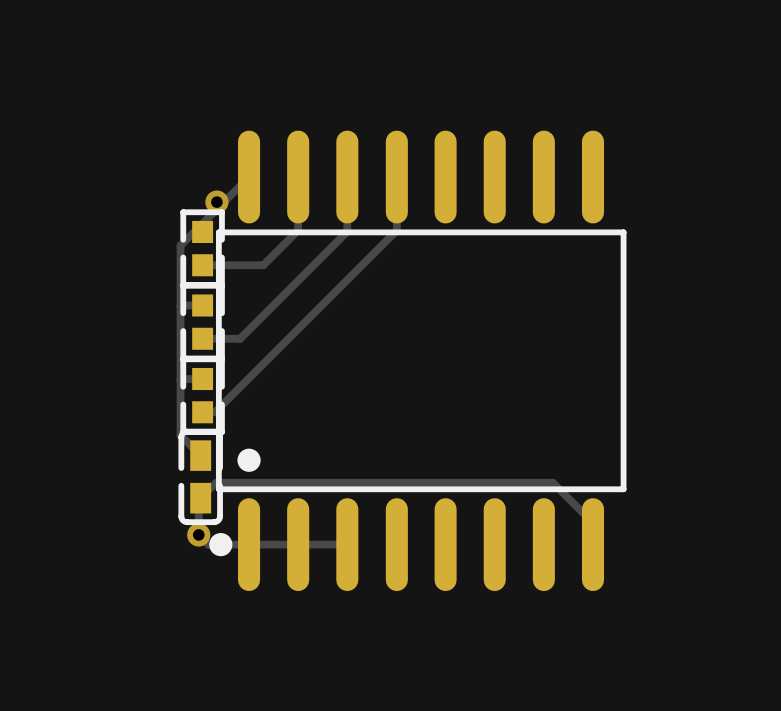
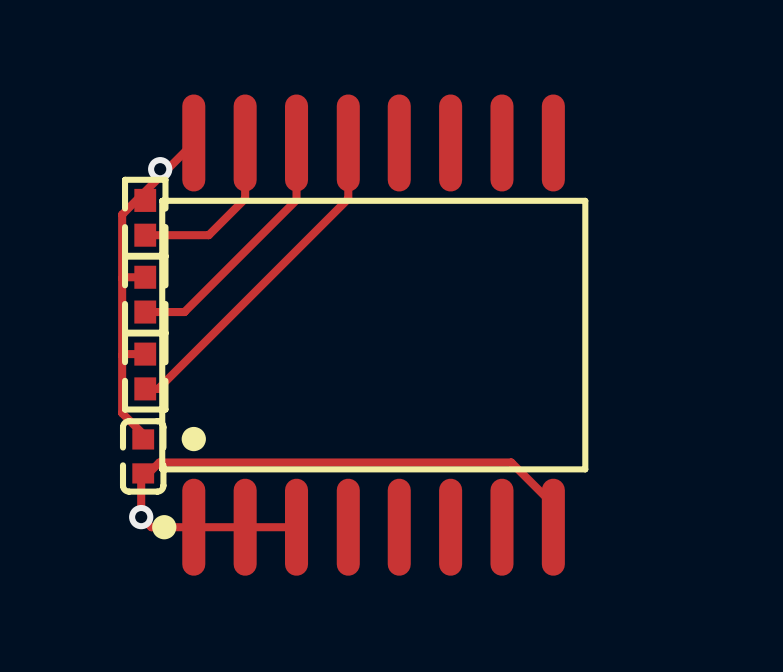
part footprint: [178, 428, 223, 526] -> [119, 418, 167, 495]

